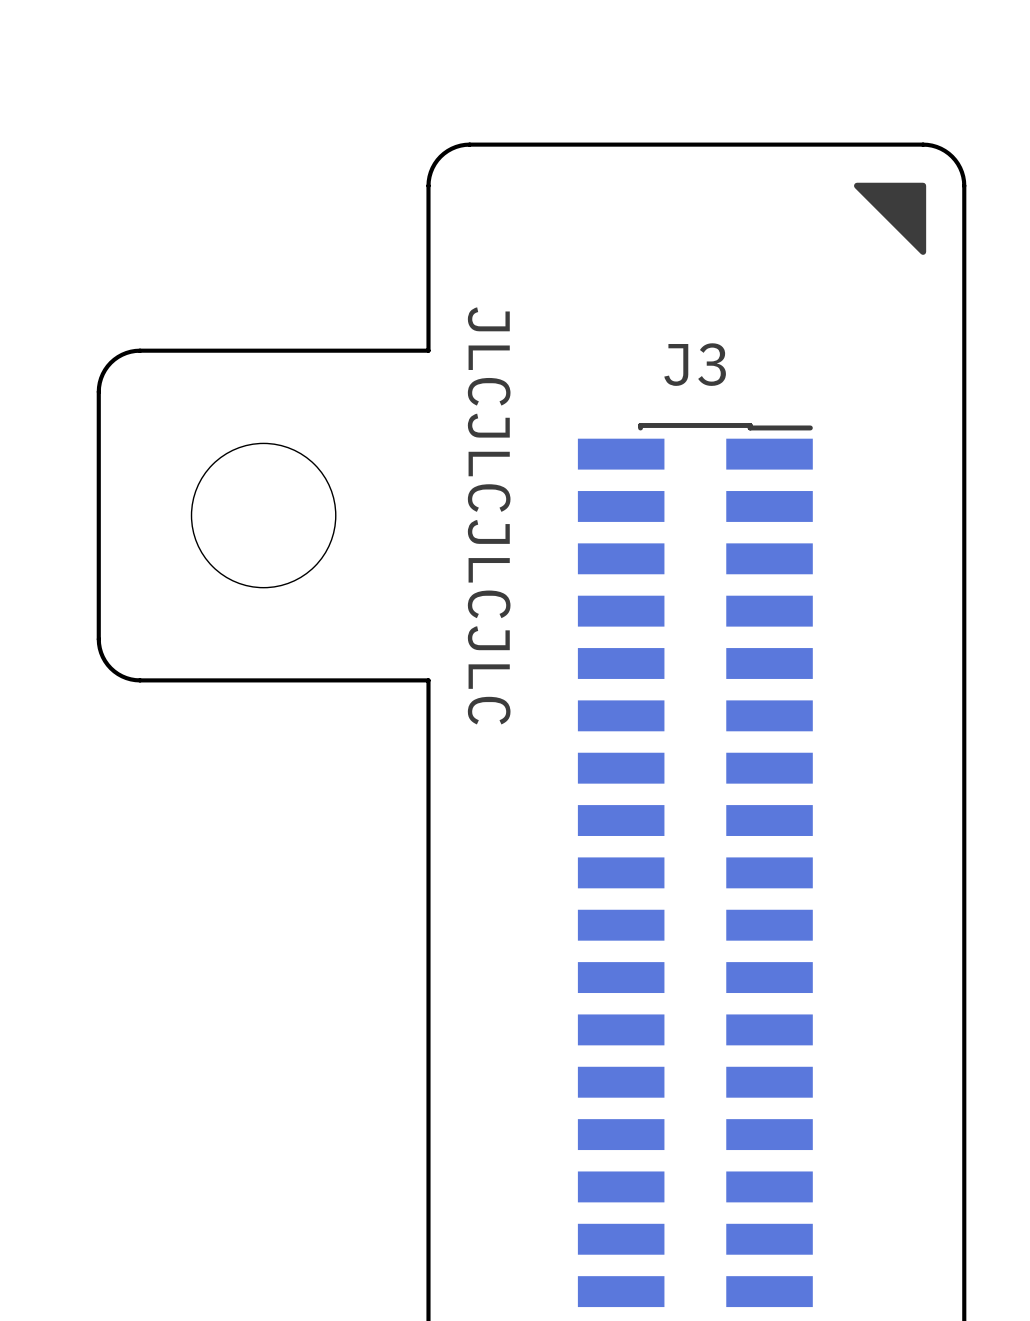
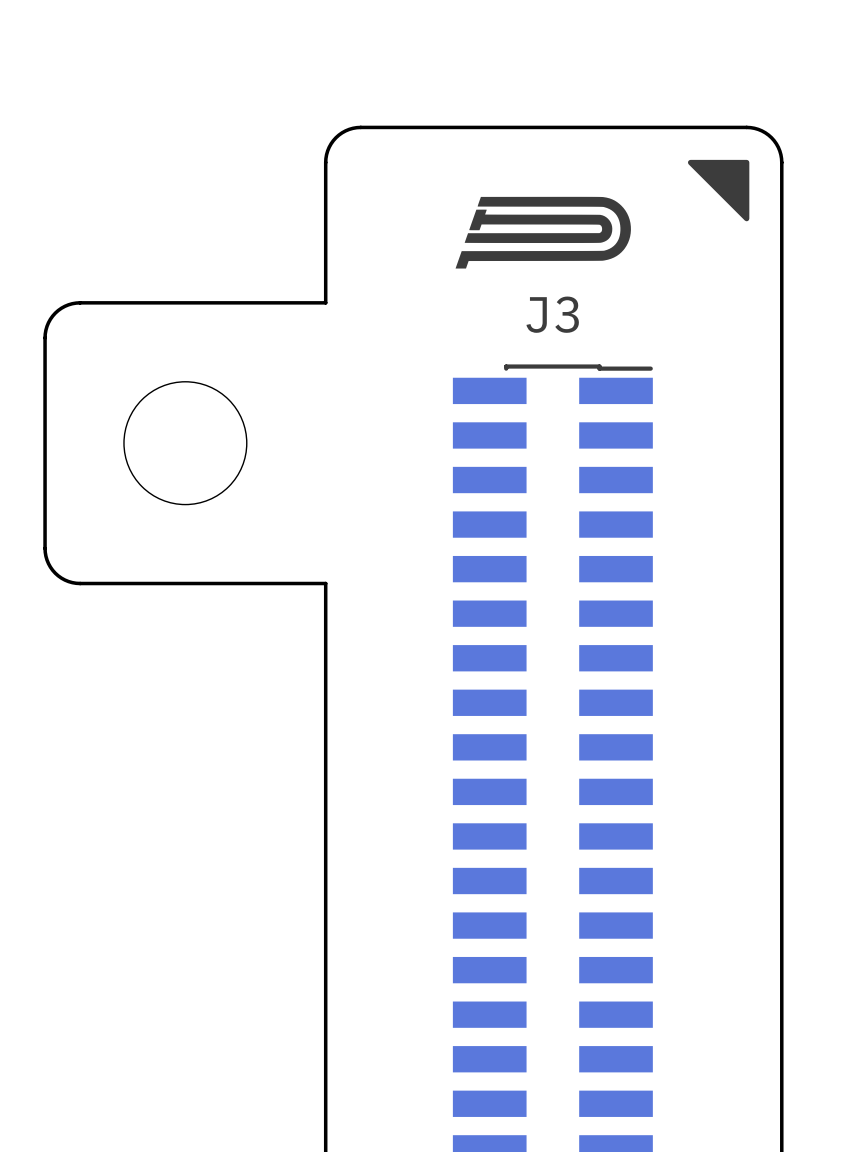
drawing: none -> [455, 196, 631, 269]
text: JLCJLCJLCJLC (489, 515) -> none

